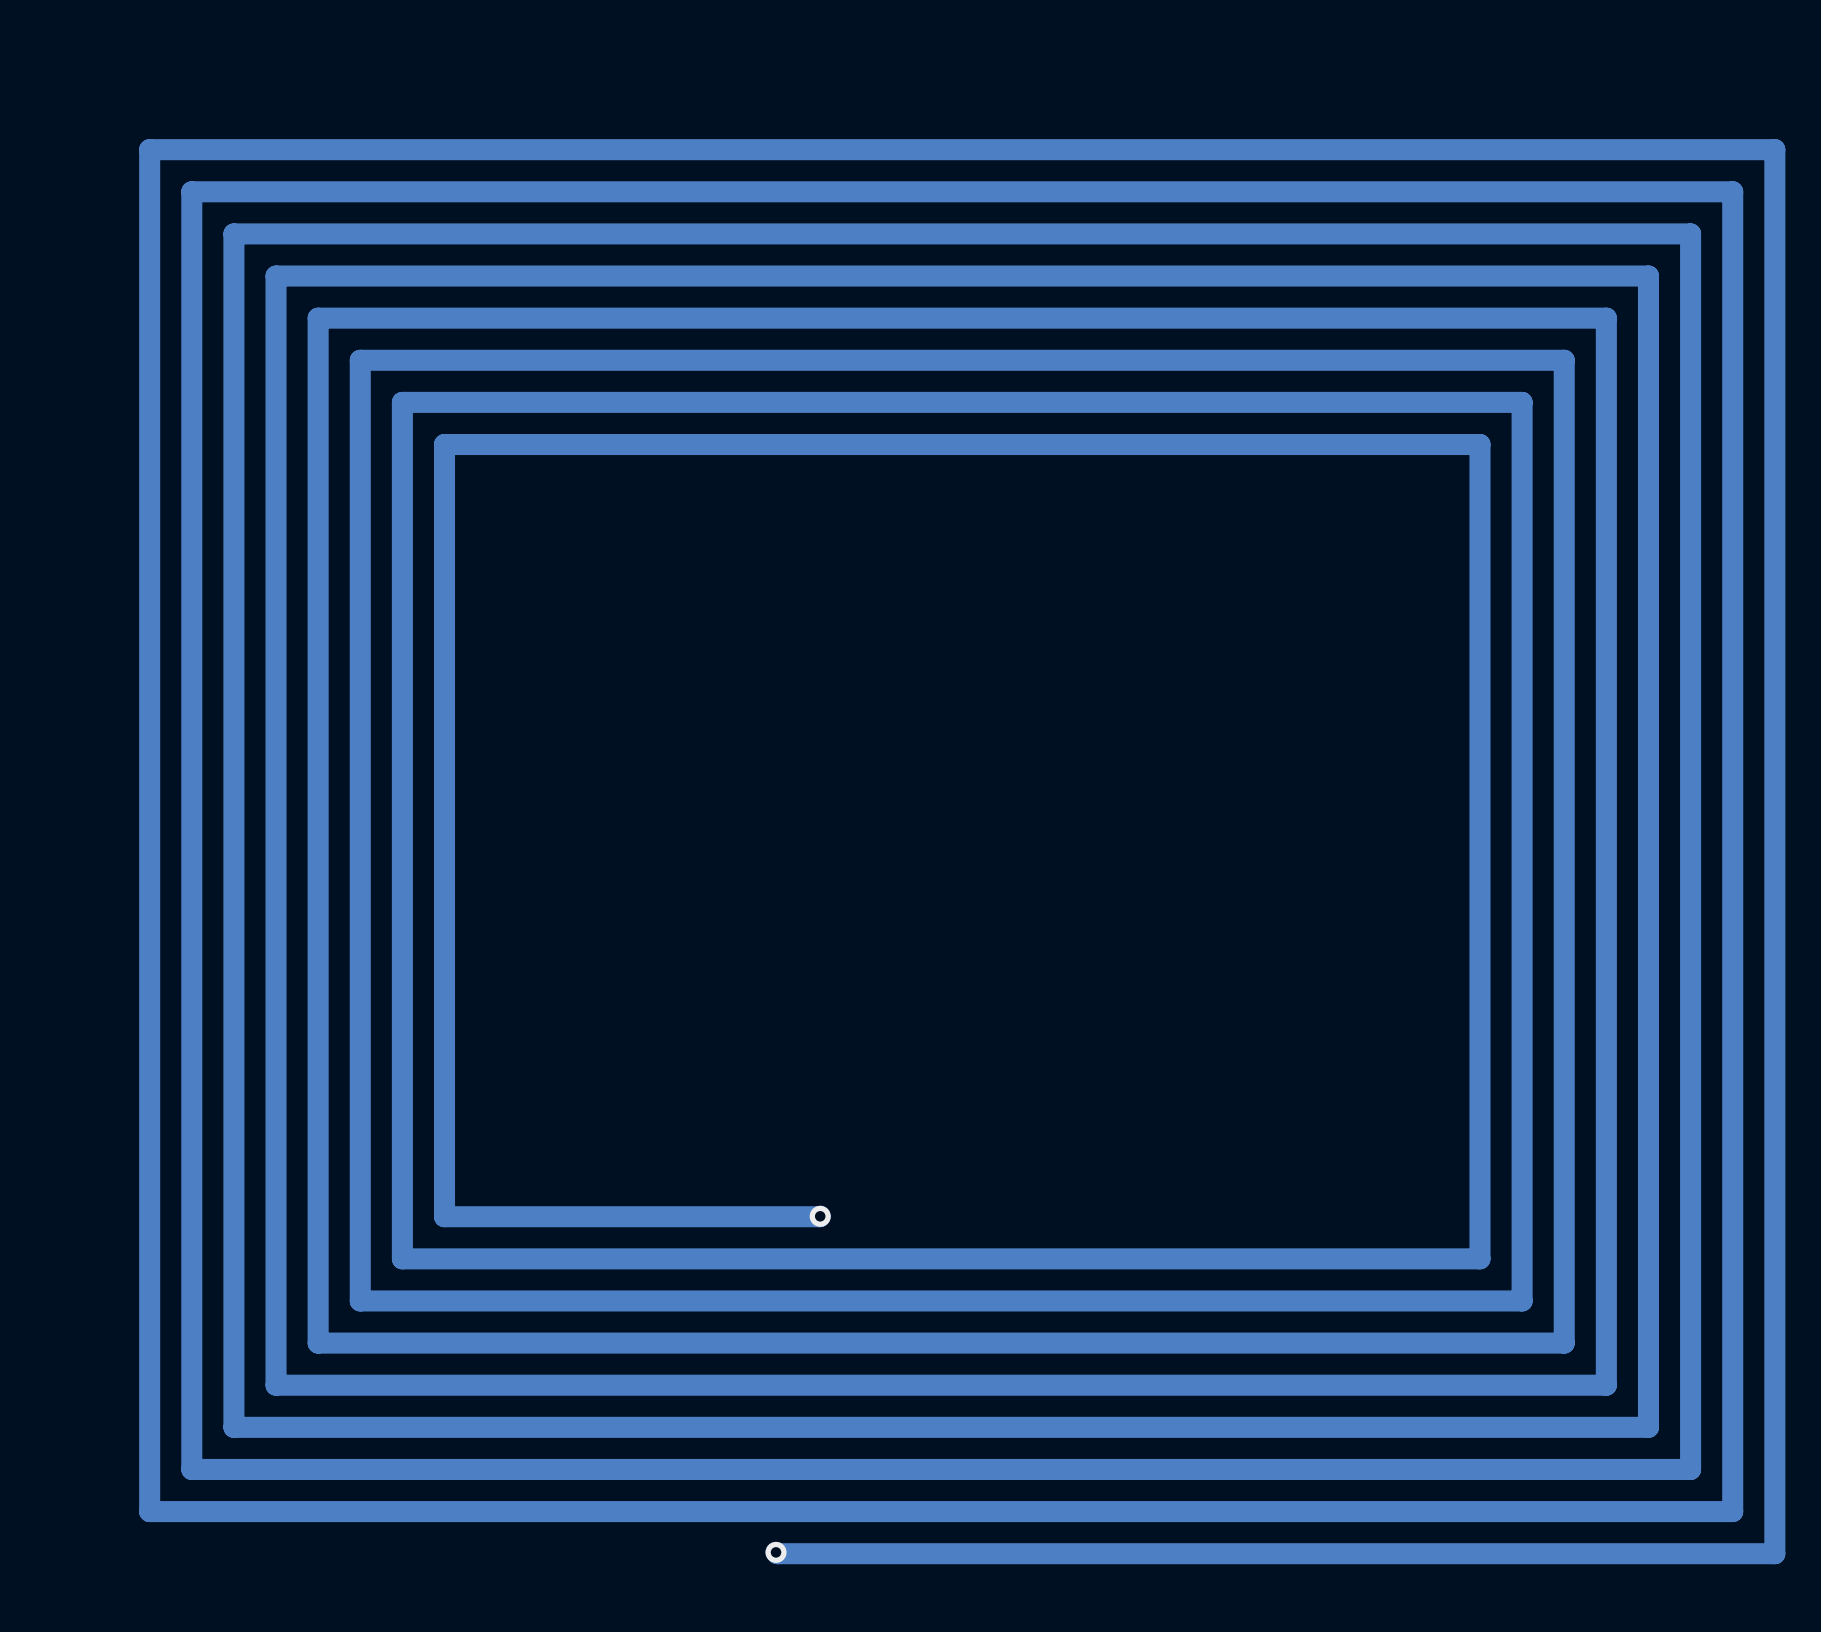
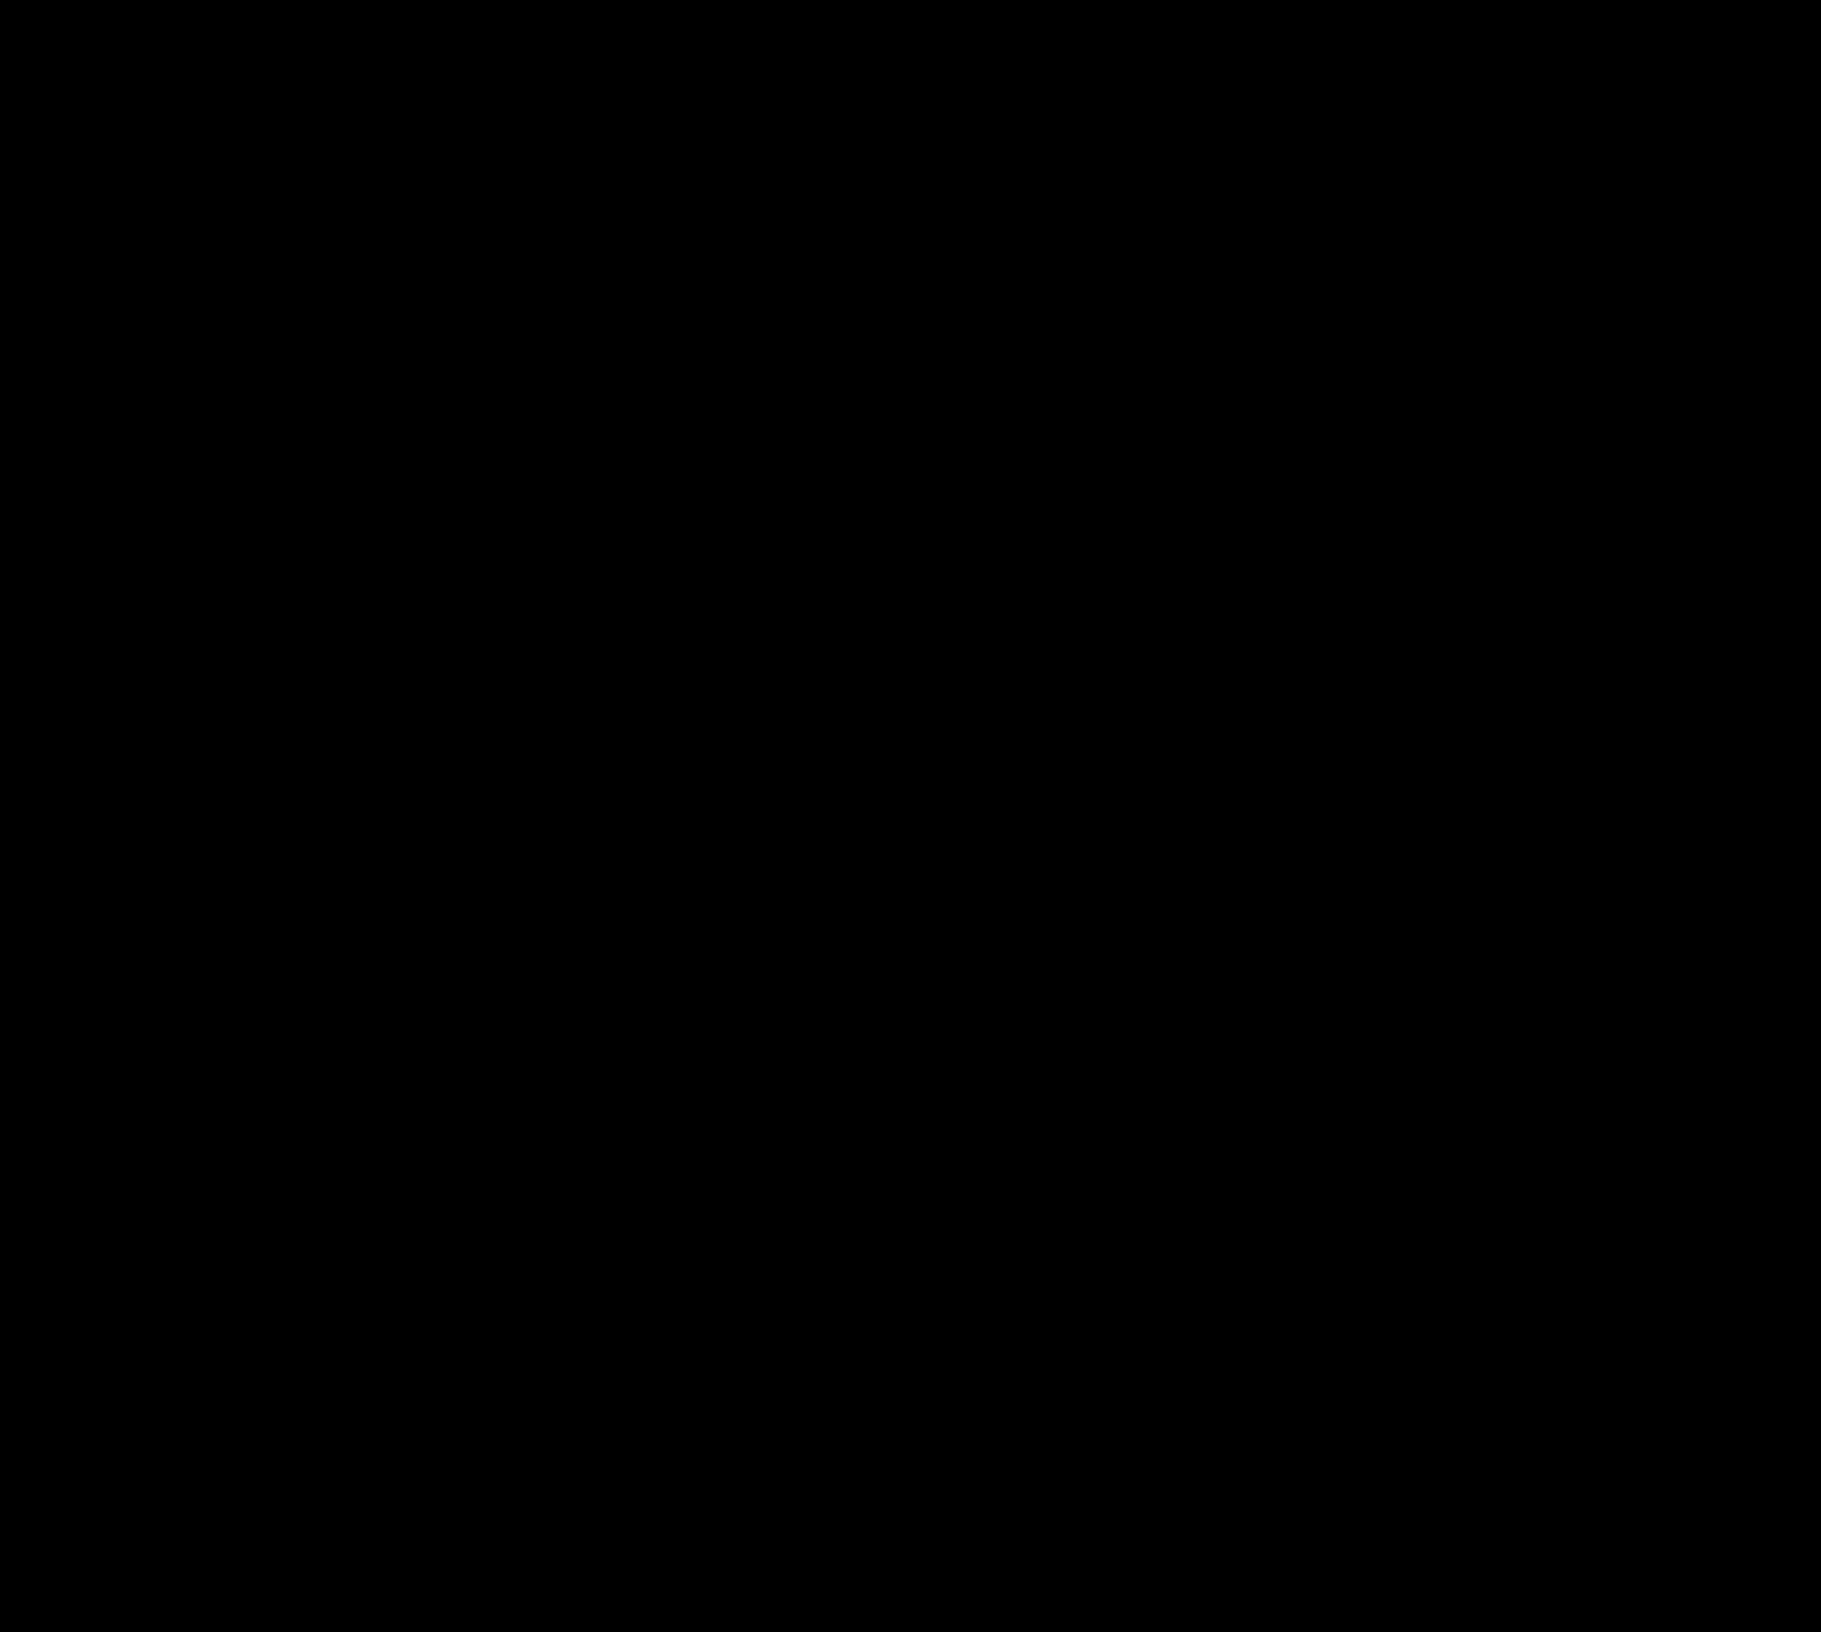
bottom track: (819, 1216) (444, 1216) (444, 444) (1479, 444) (1479, 1258) (402, 1258) (402, 402) (1522, 402) (1522, 1300) (360, 1300) (360, 360) (1564, 360) (1564, 1343) (318, 1343) (318, 318) (1606, 318) (1606, 1385) (276, 1385) (276, 276) (1648, 276) (1648, 1427) (233, 1427) (233, 233) (1690, 233) (1690, 1469) (191, 1469) (191, 191) (1732, 191) (1732, 1511) (149, 1511) (149, 149) (1774, 149) (1774, 1553) (776, 1552) -> none
via: (820, 1216) -> none
via: (776, 1552) -> none

